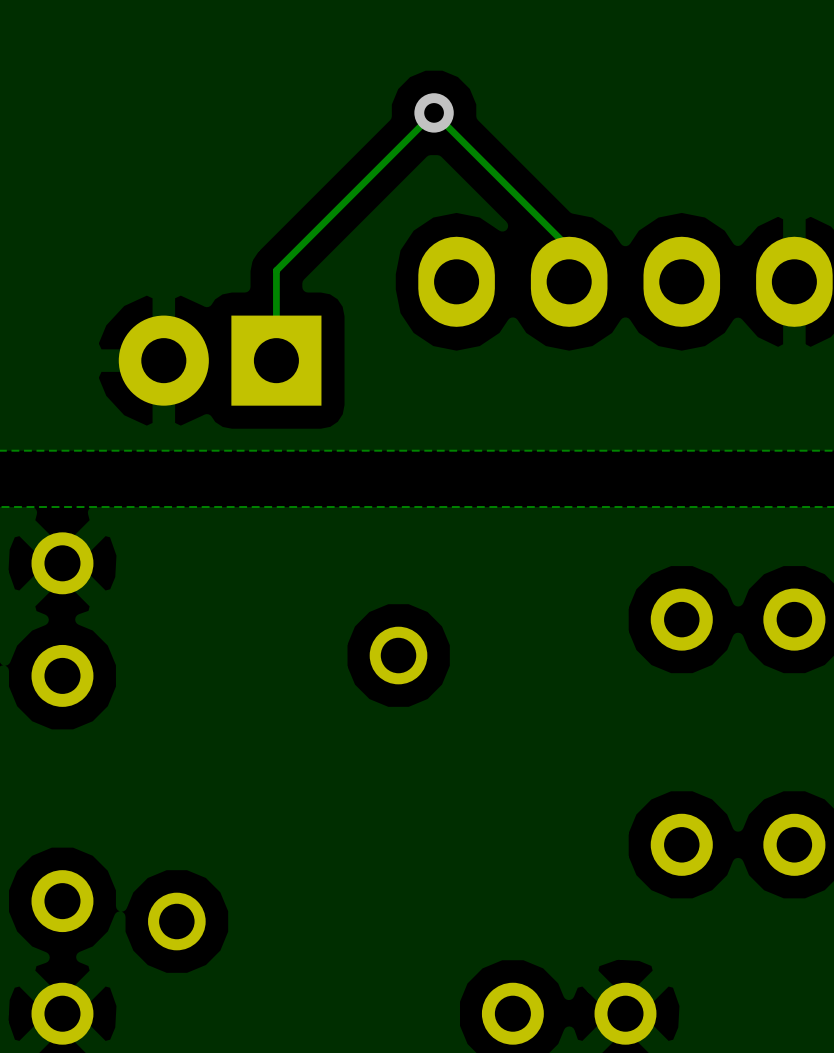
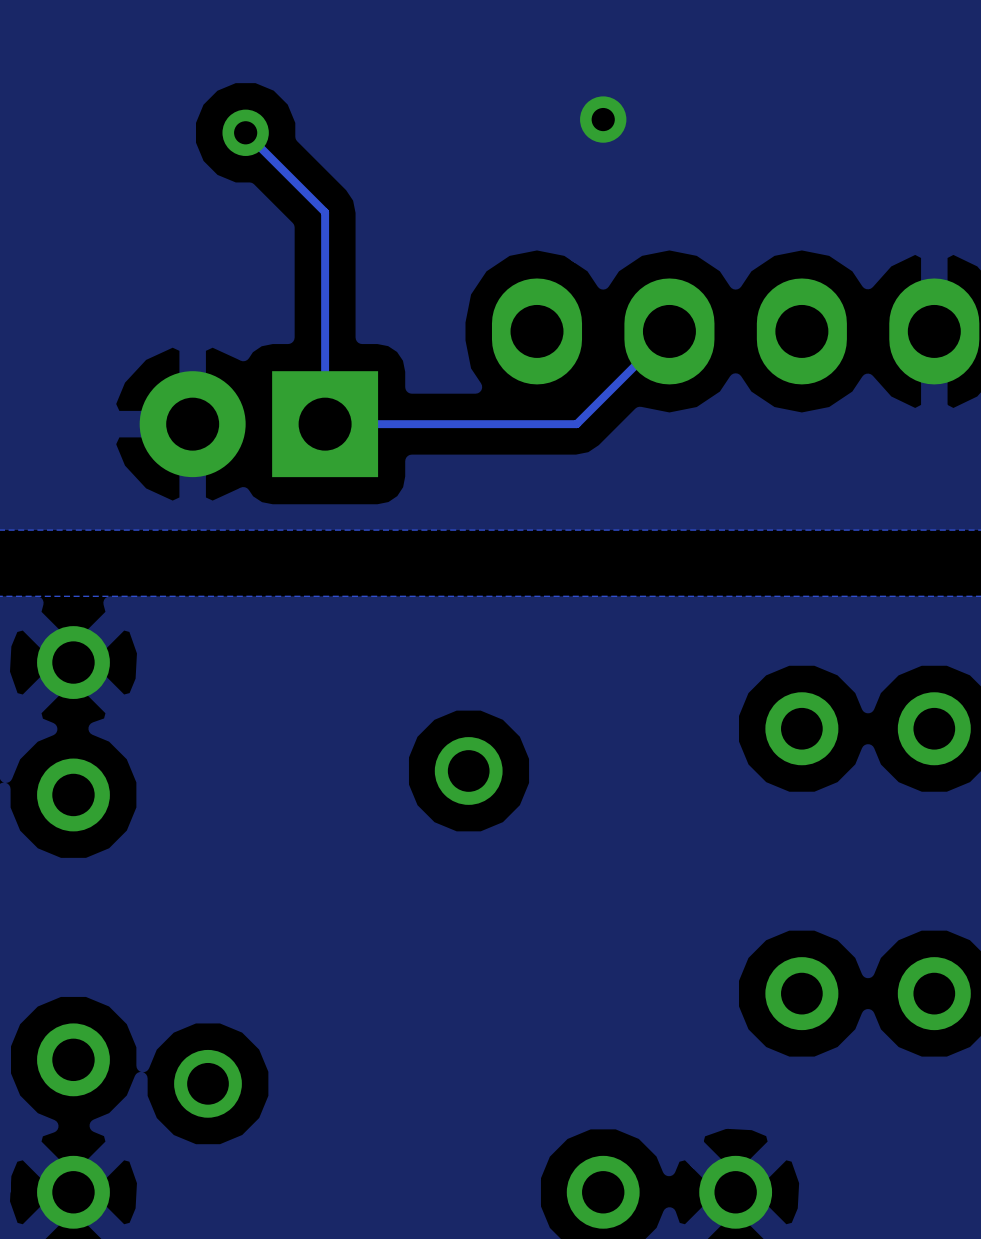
track: none -> (245, 132) (325, 212) (325, 318)
via: none -> (245, 132)
via position: (434, 112) -> (603, 119)
track: (276, 270) (434, 112) (569, 248) (569, 281) -> (325, 424) (576, 424) (669, 331)

